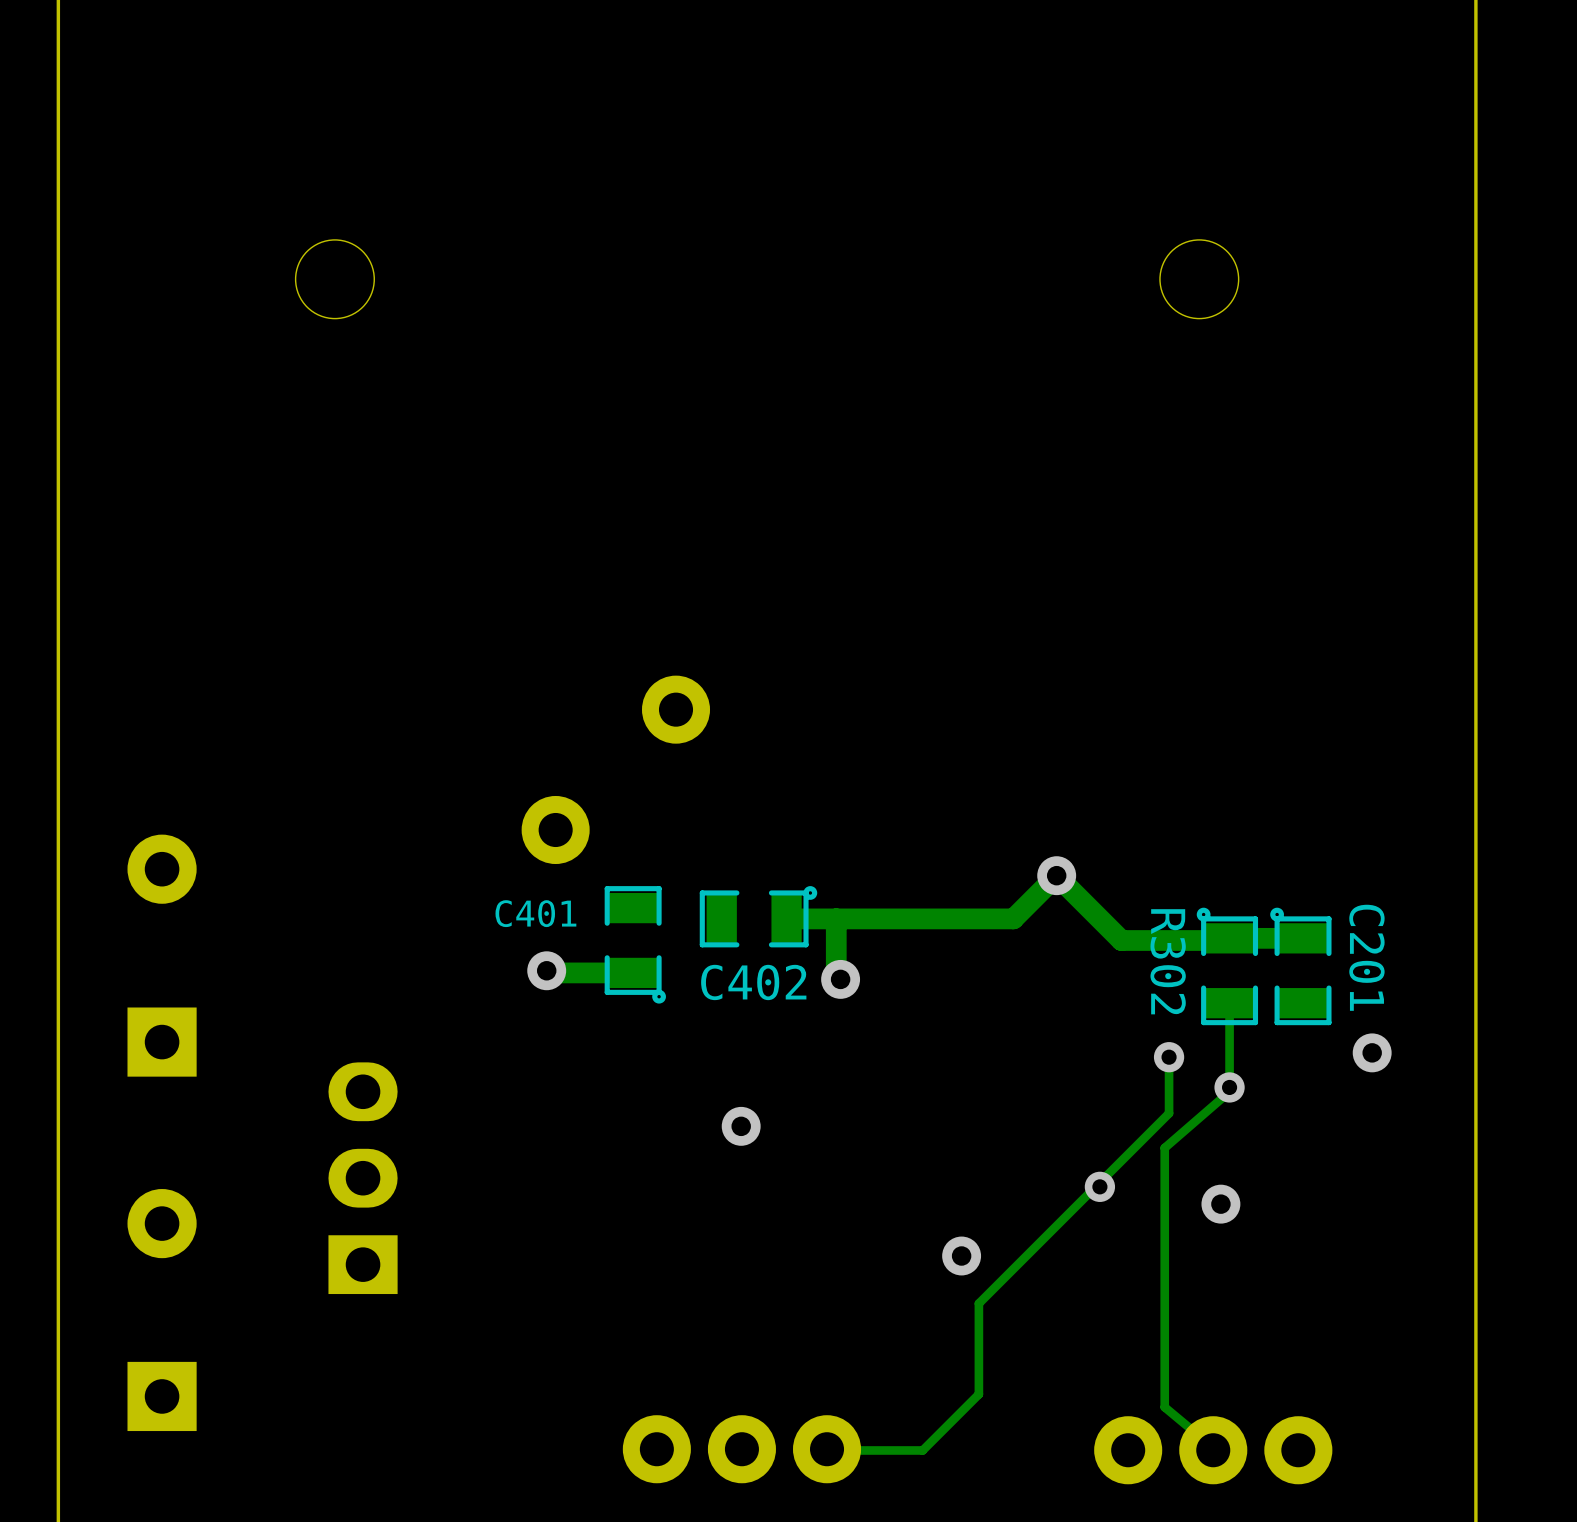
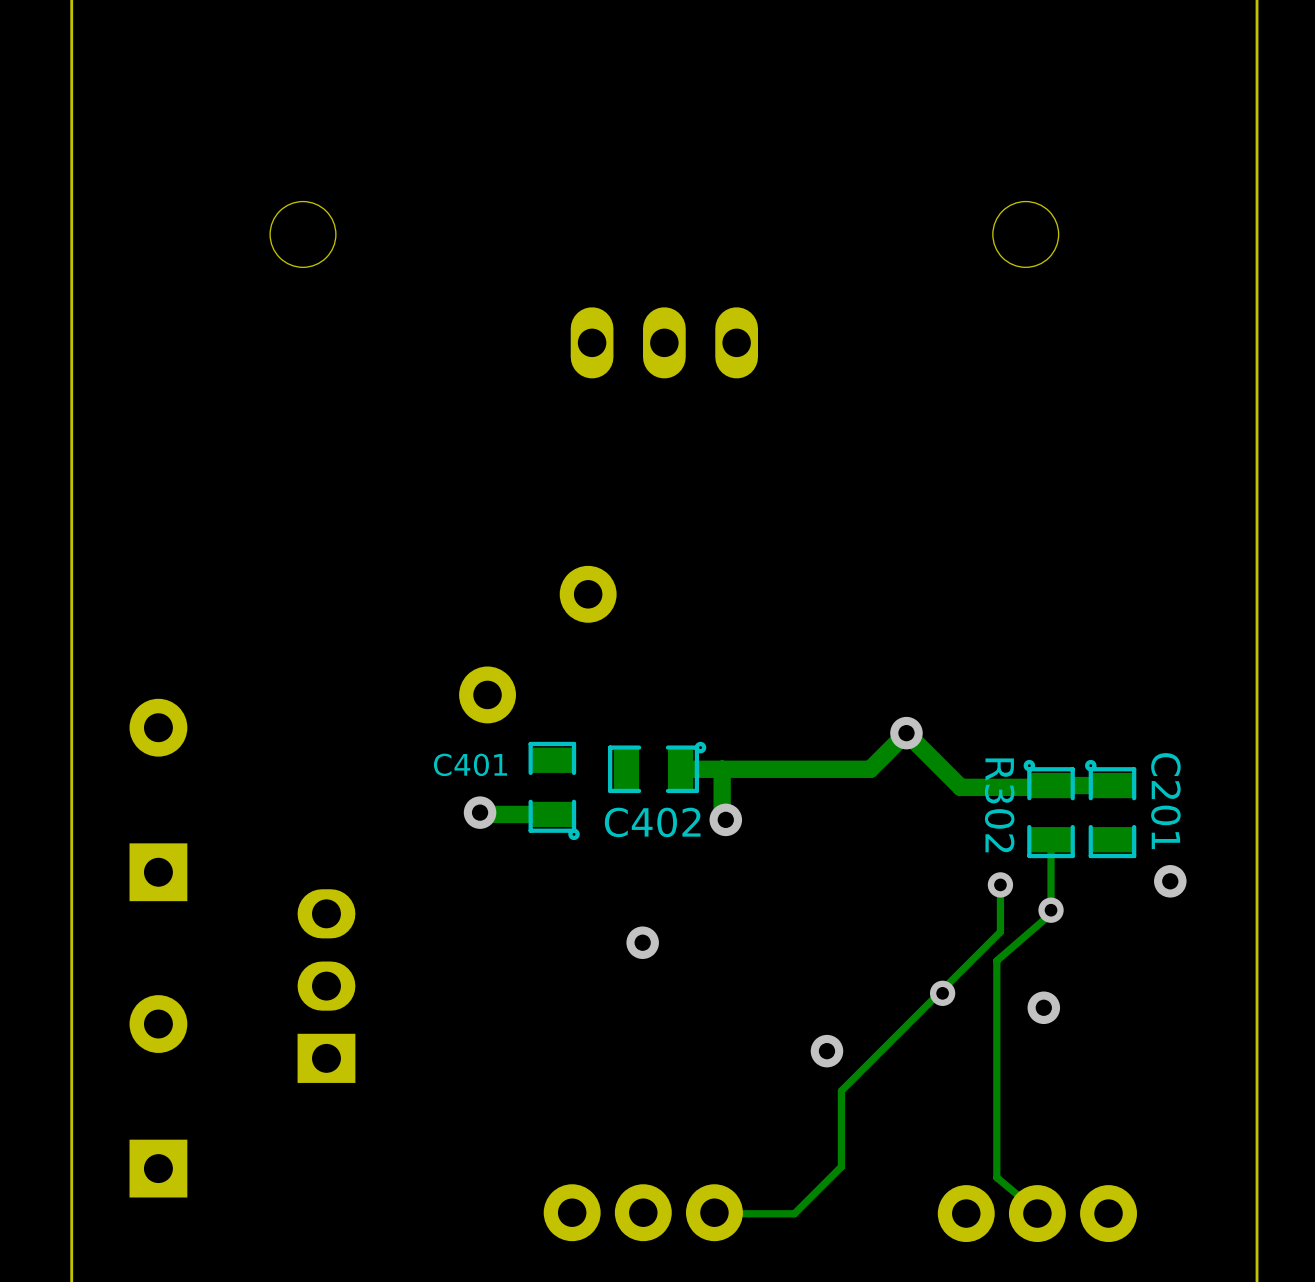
part: none -> (664, 342)

